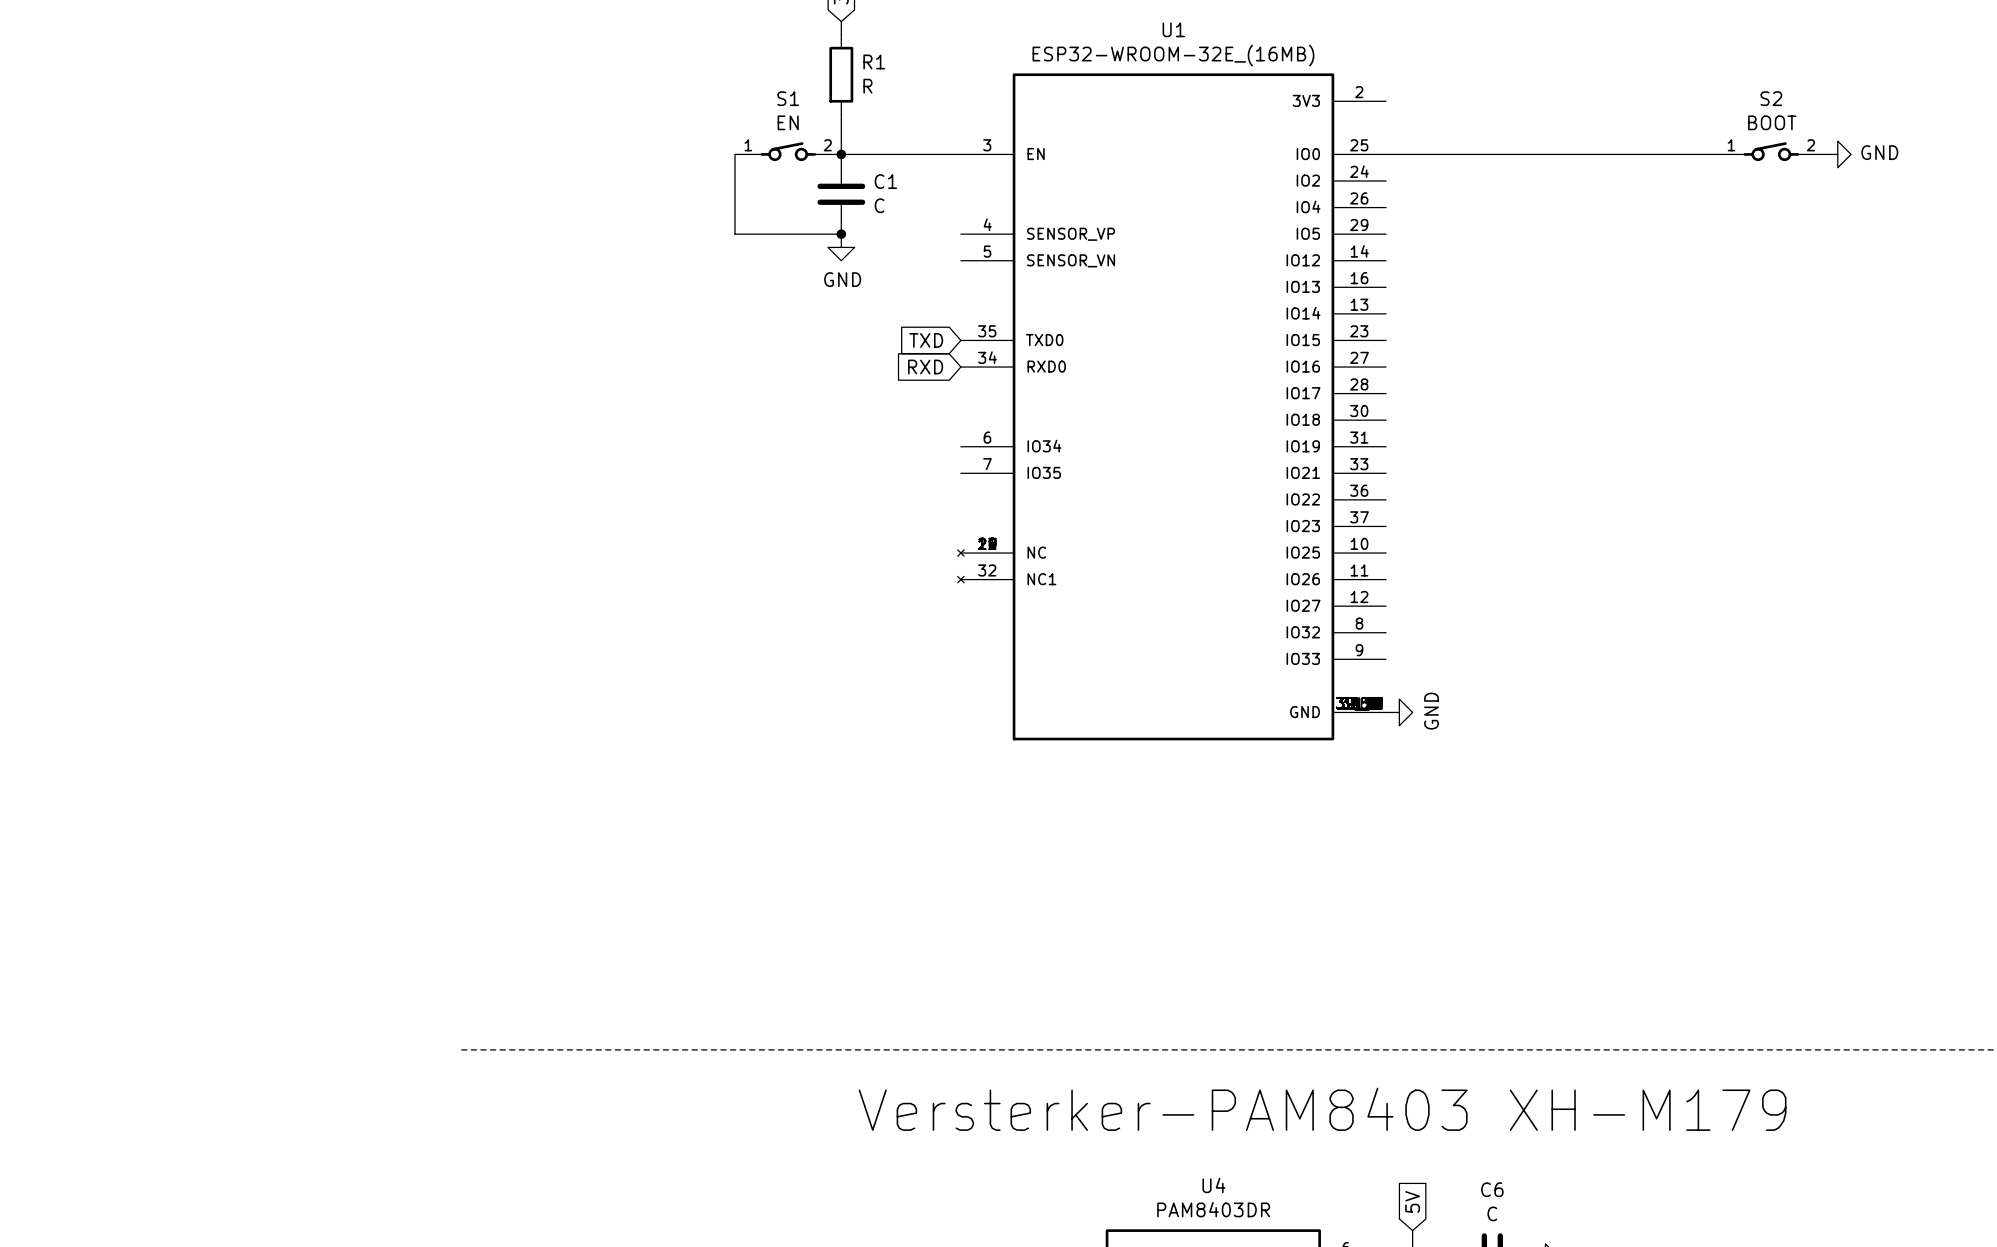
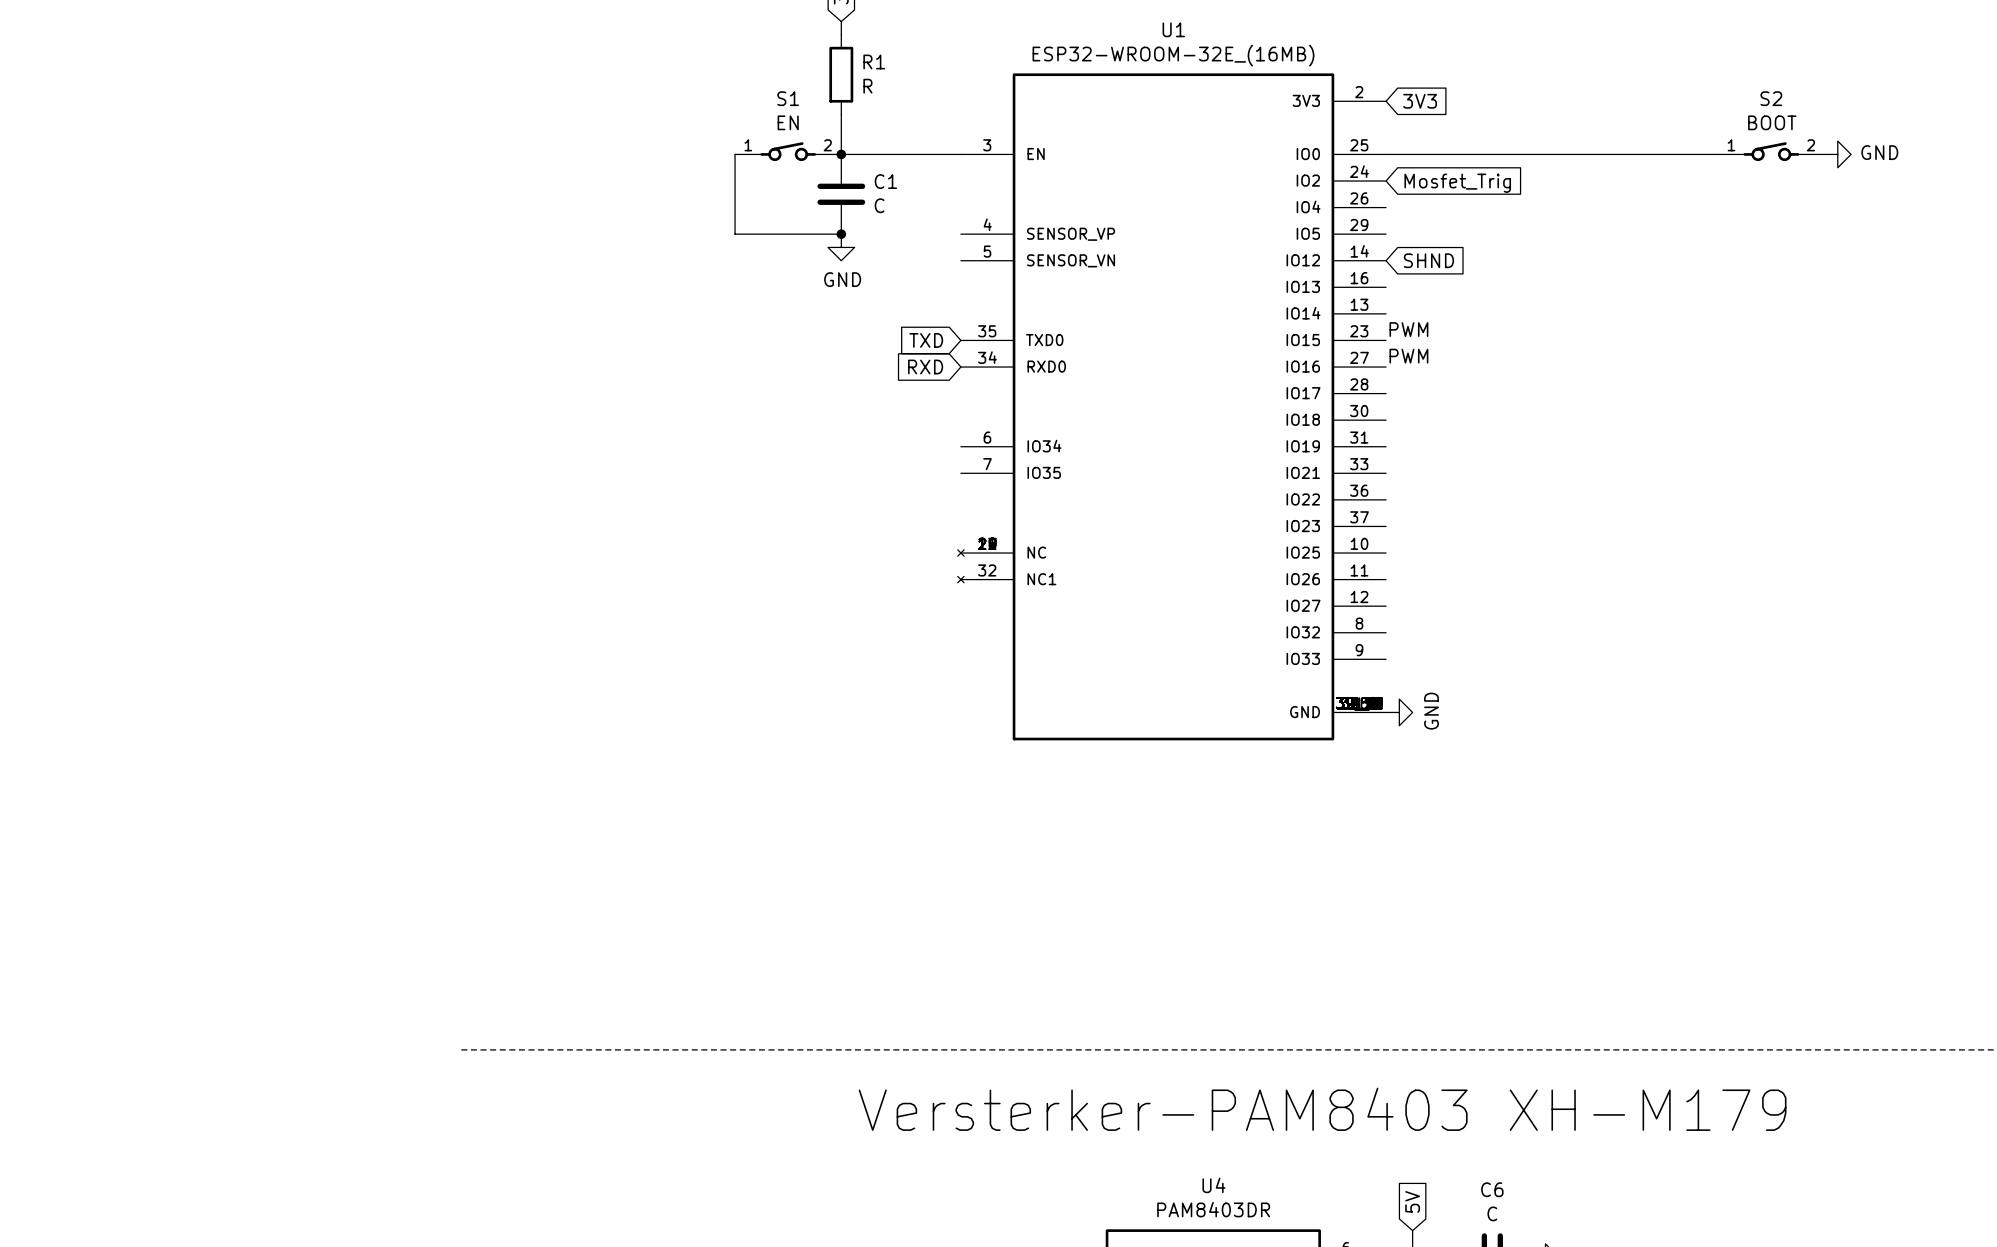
global label: none -> 3V3 (1420, 101)
global label: none -> Mosfet_Trig (1457, 183)
global label: none -> SHND (1428, 260)
text: none -> PWM (1408, 329)
text: none -> PWM (1408, 356)

